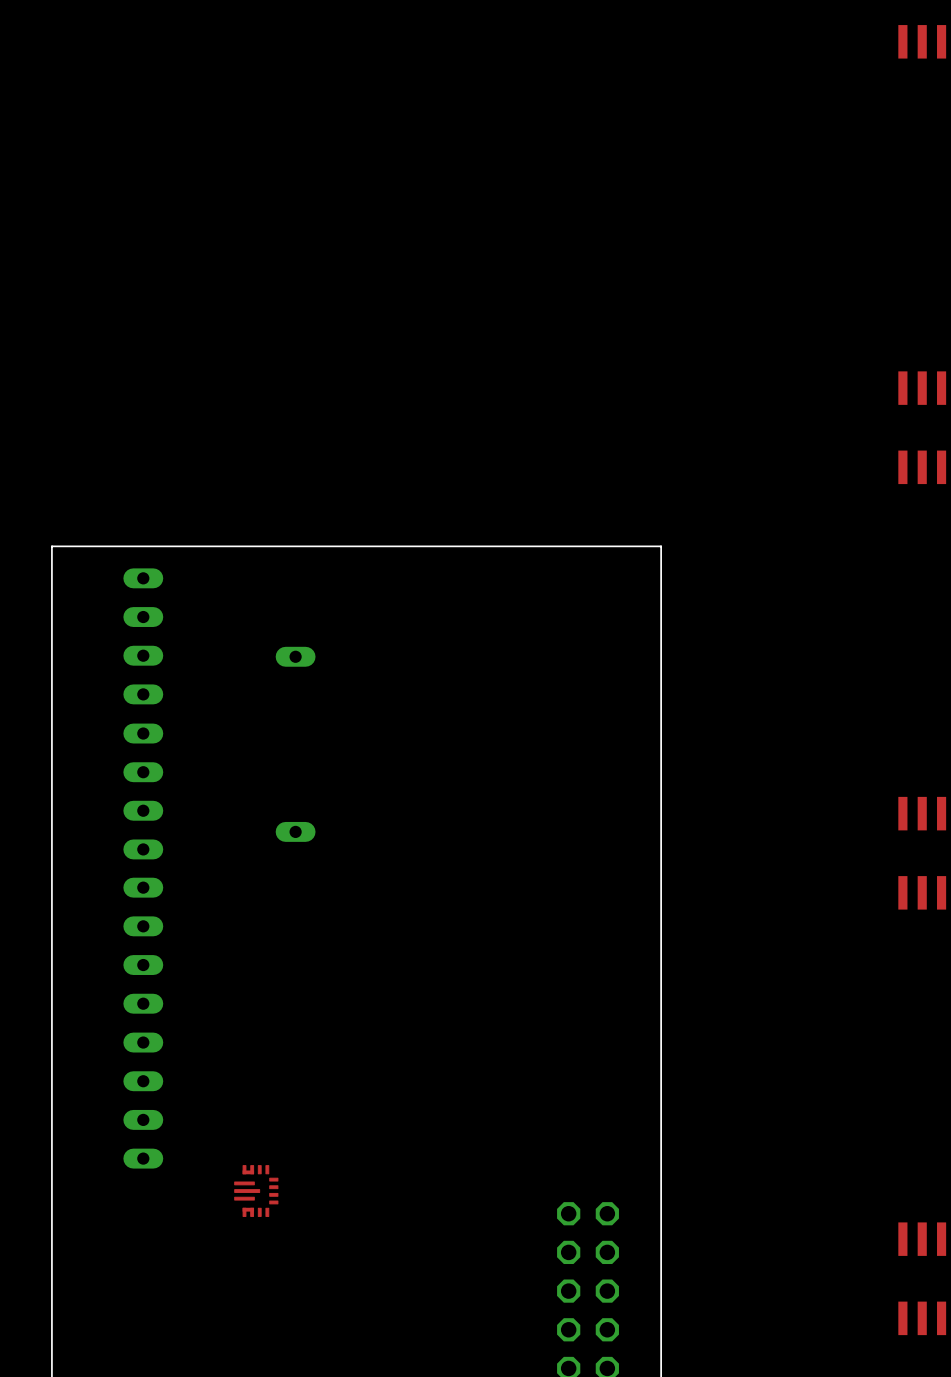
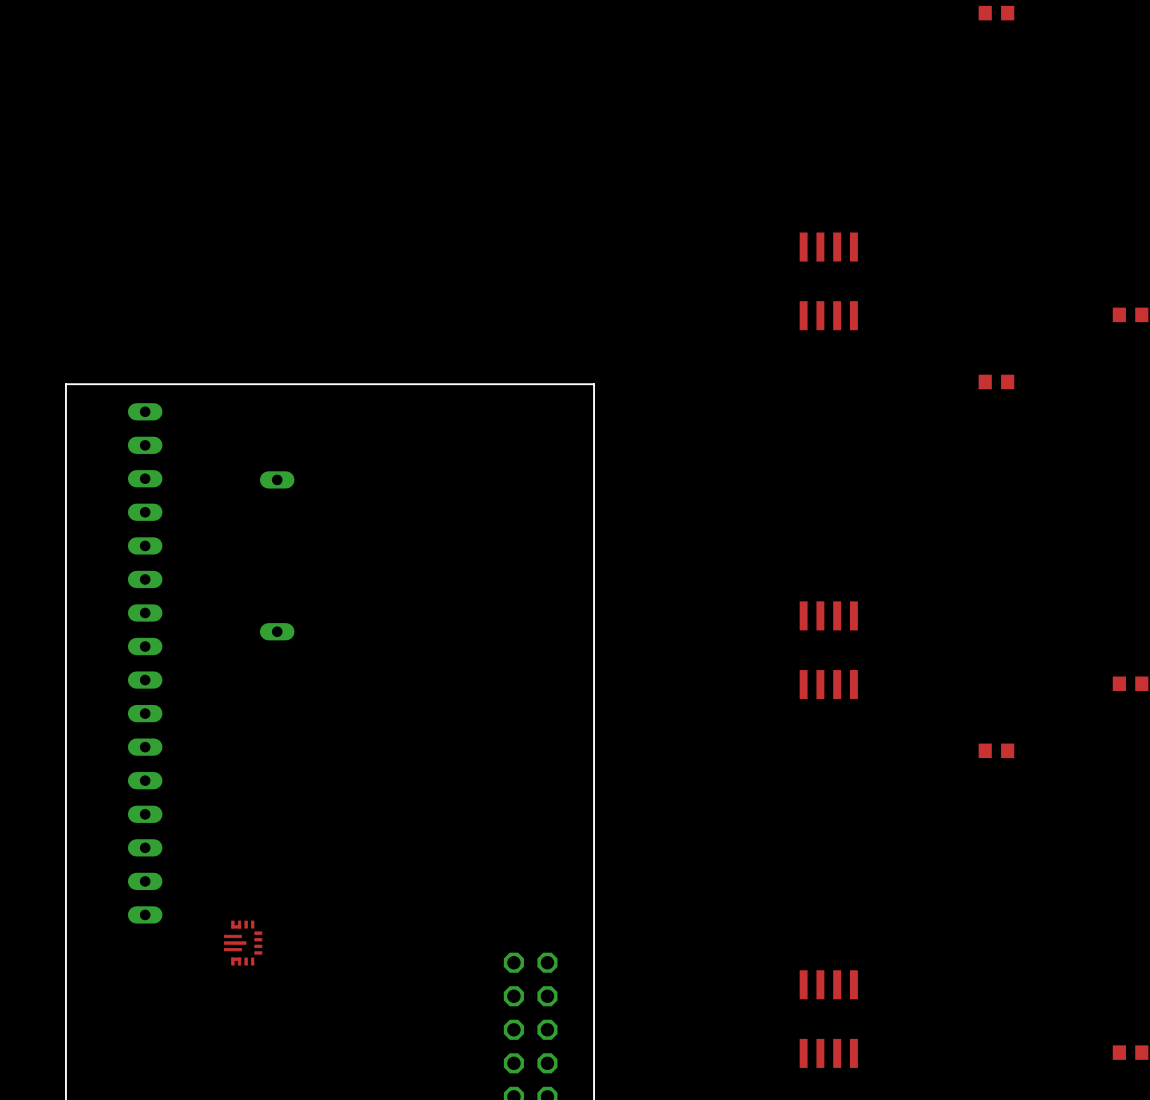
part position: (143, 636) -> (145, 596)
part: none -> (145, 495)
part: (143, 752) -> none
part: (143, 830) -> none

